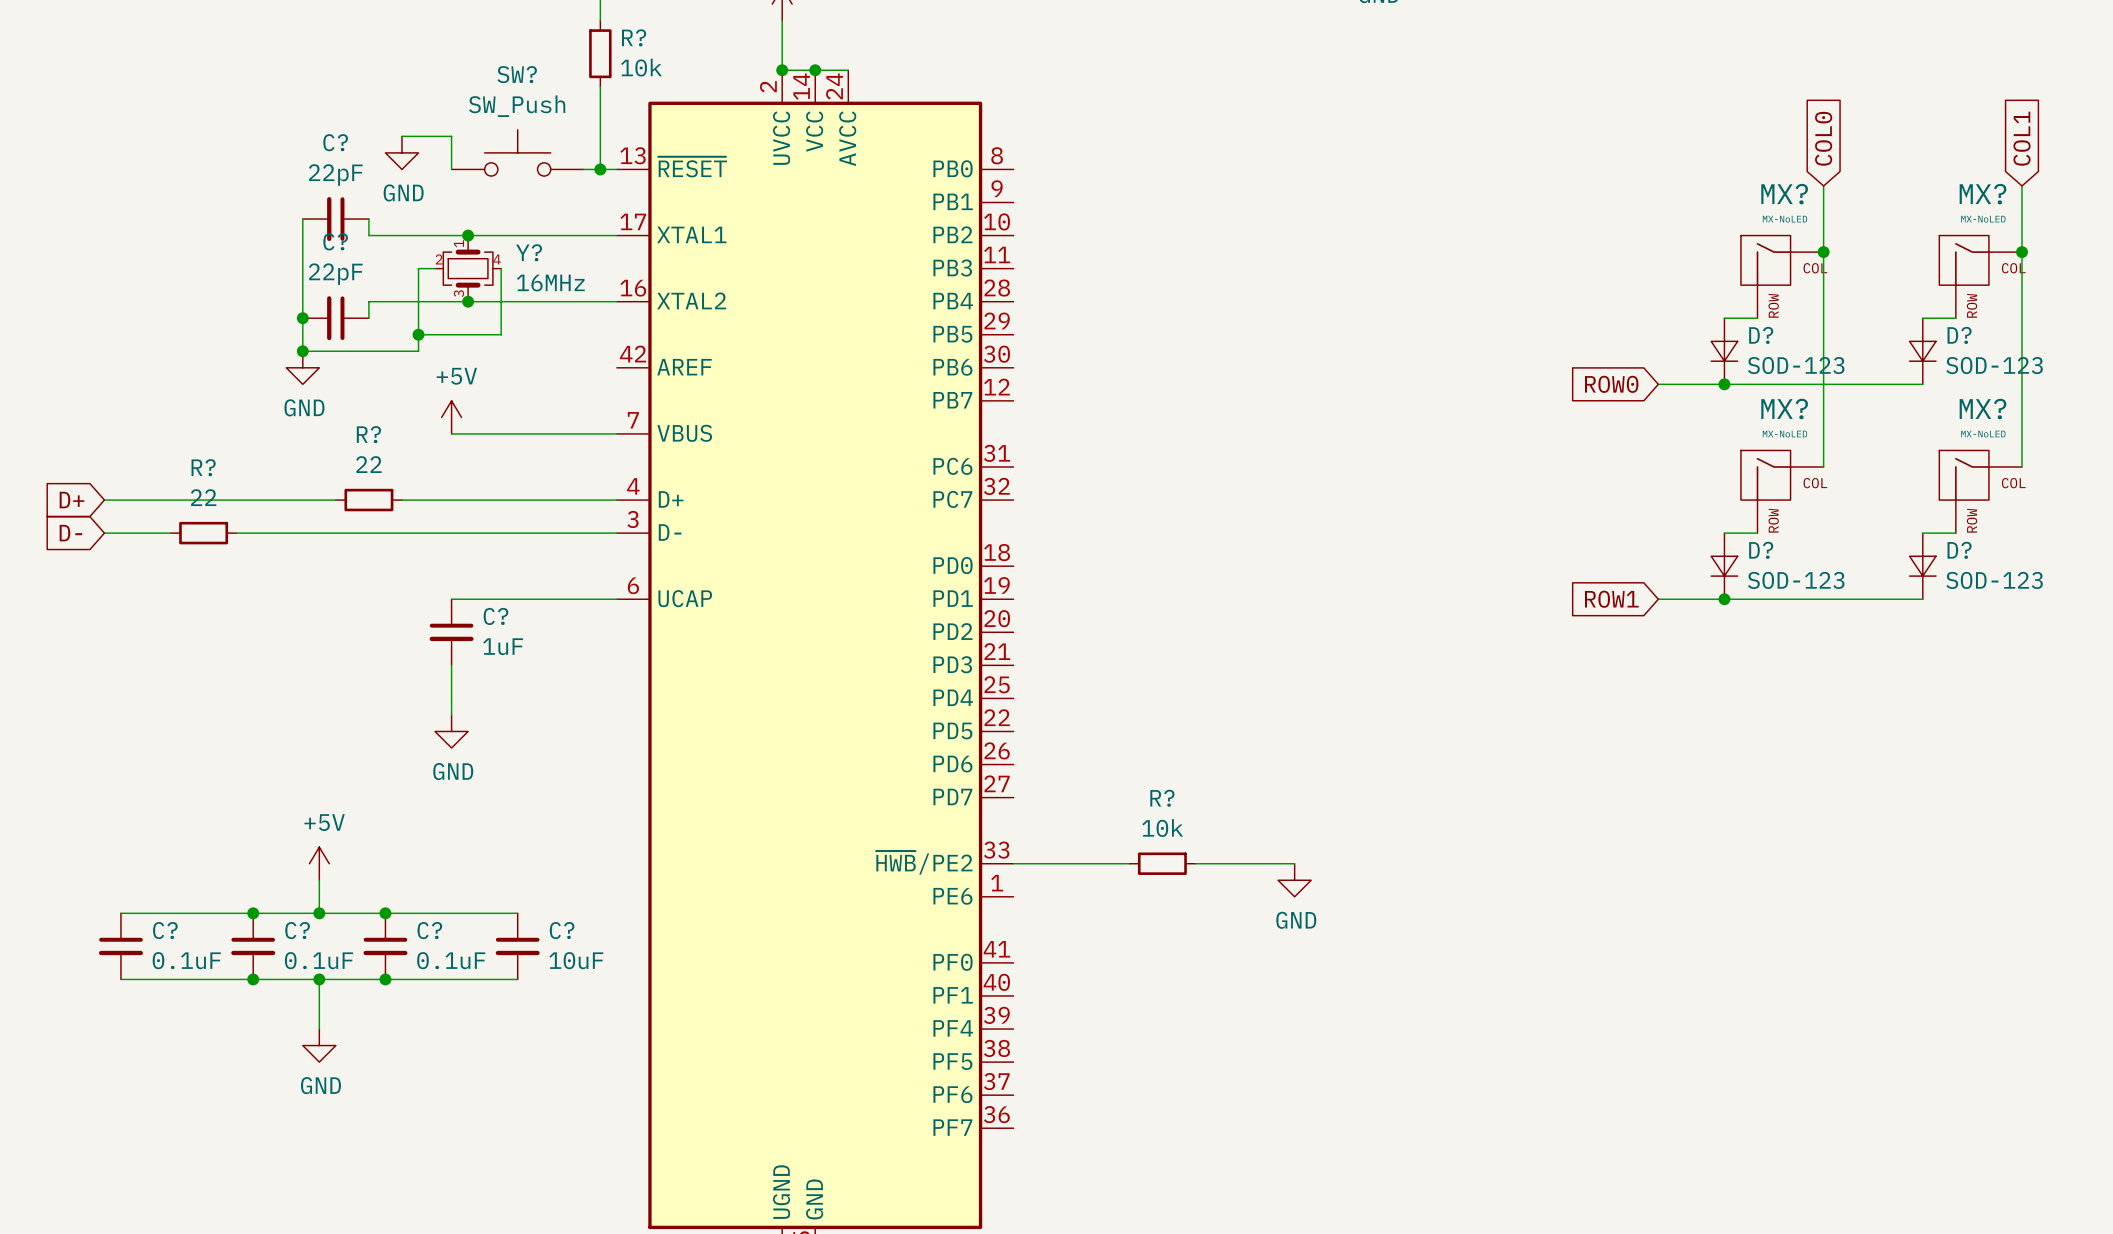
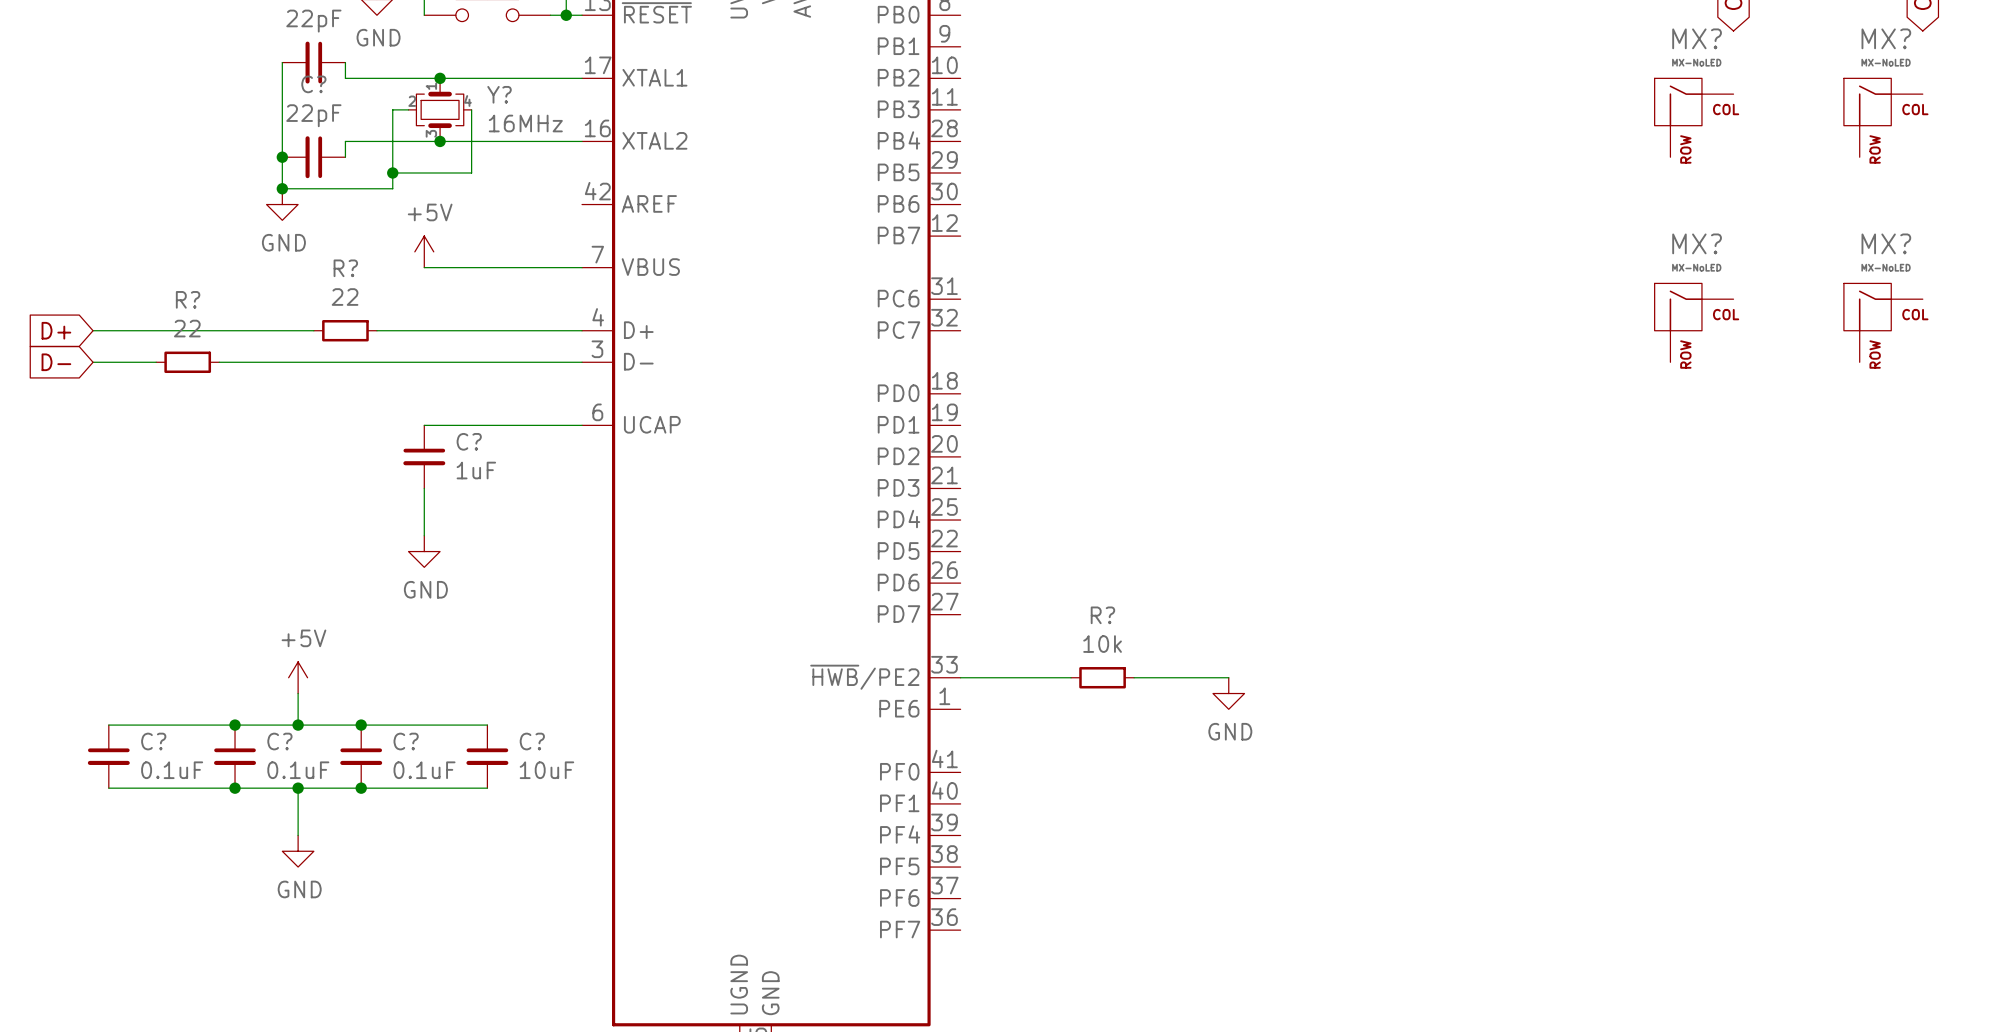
wire: (1823, 185) (1823, 466) -> none
wire: (2021, 185) (2021, 466) -> none
junction: (1823, 252) -> none
junction: (2021, 252) -> none
wire: (1724, 318) (1757, 318) -> none
wire: (1922, 318) (1955, 318) -> none
D?: SOD-123 (1724, 351) -> none
D?: SOD-123 (1922, 351) -> none
global label: ROW0 (1611, 384) -> none
wire: (1658, 384) (1922, 384) -> none
junction: (1724, 384) -> none
wire: (1724, 533) (1757, 533) -> none
wire: (1922, 533) (1955, 533) -> none
D?: SOD-123 (1724, 566) -> none
D?: SOD-123 (1922, 566) -> none
global label: ROW1 (1611, 599) -> none
wire: (1658, 599) (1922, 599) -> none
junction: (1724, 599) -> none

